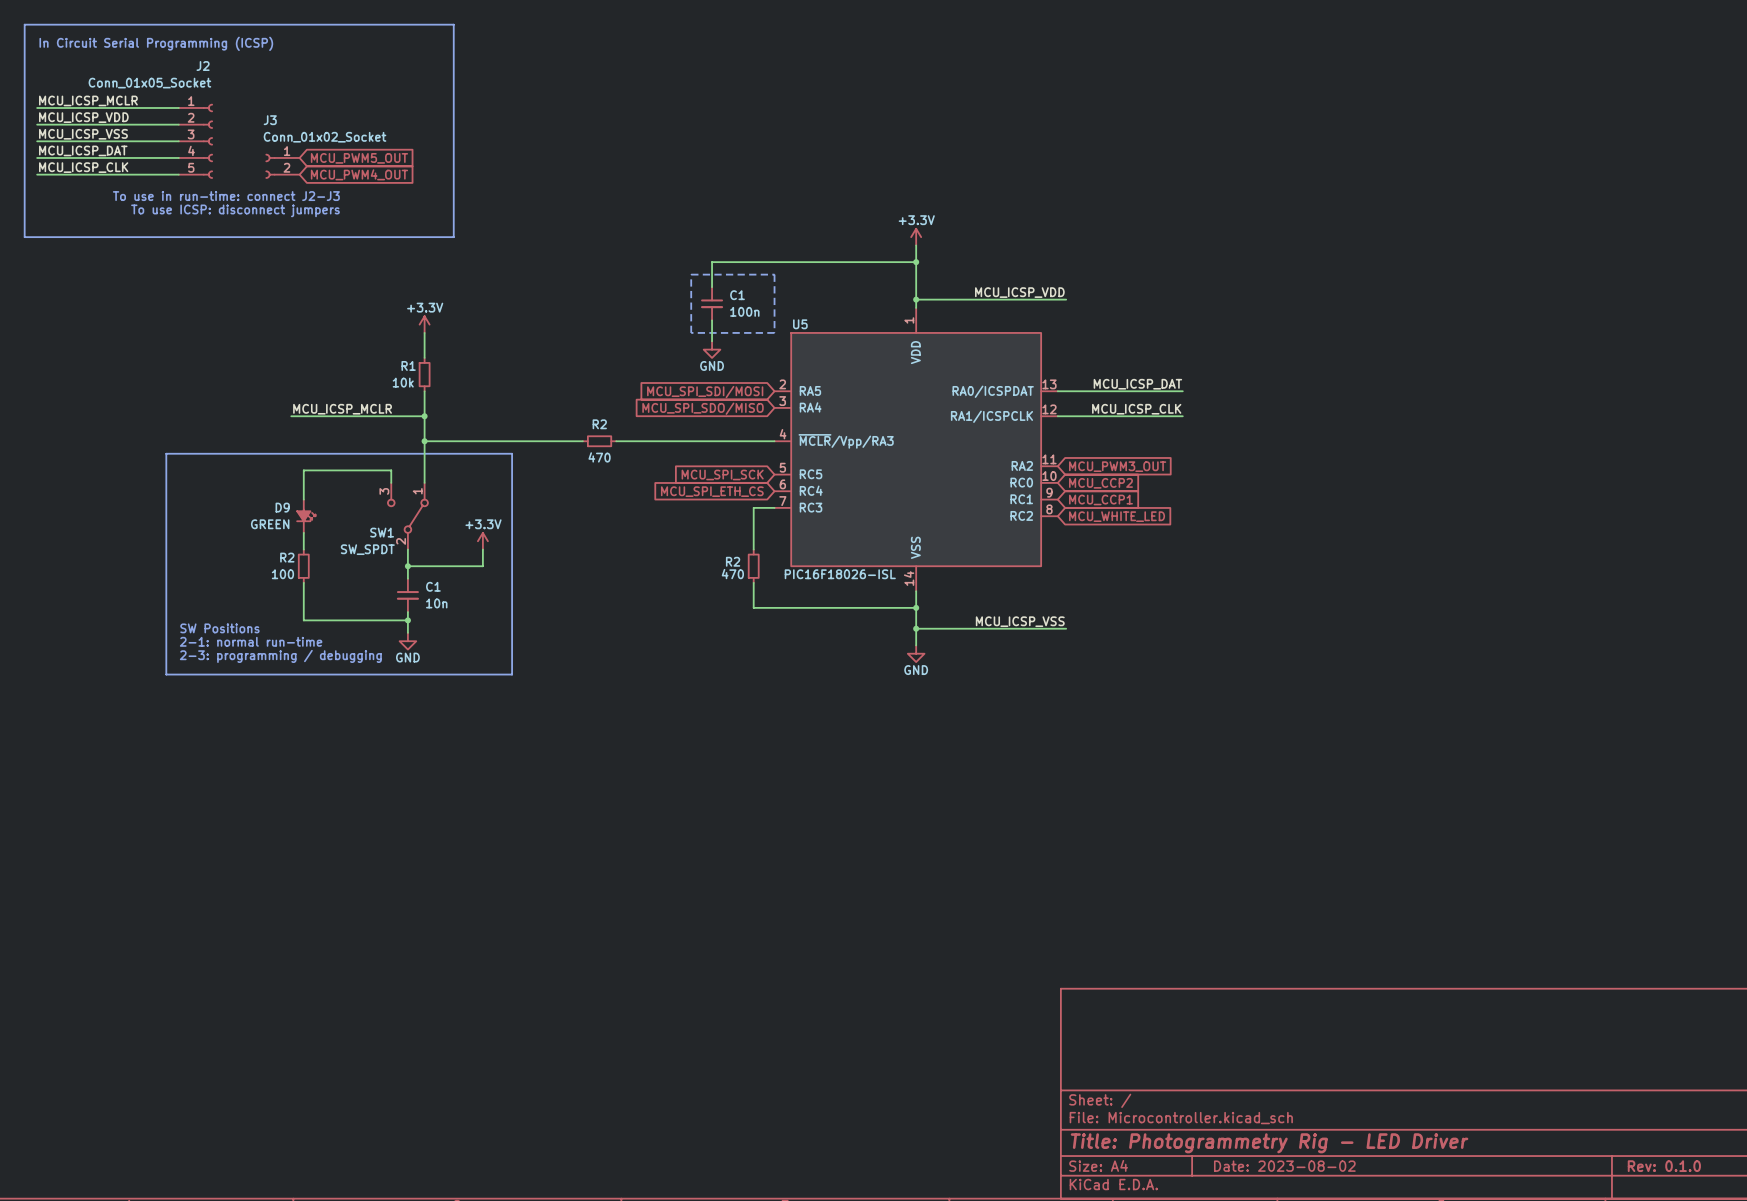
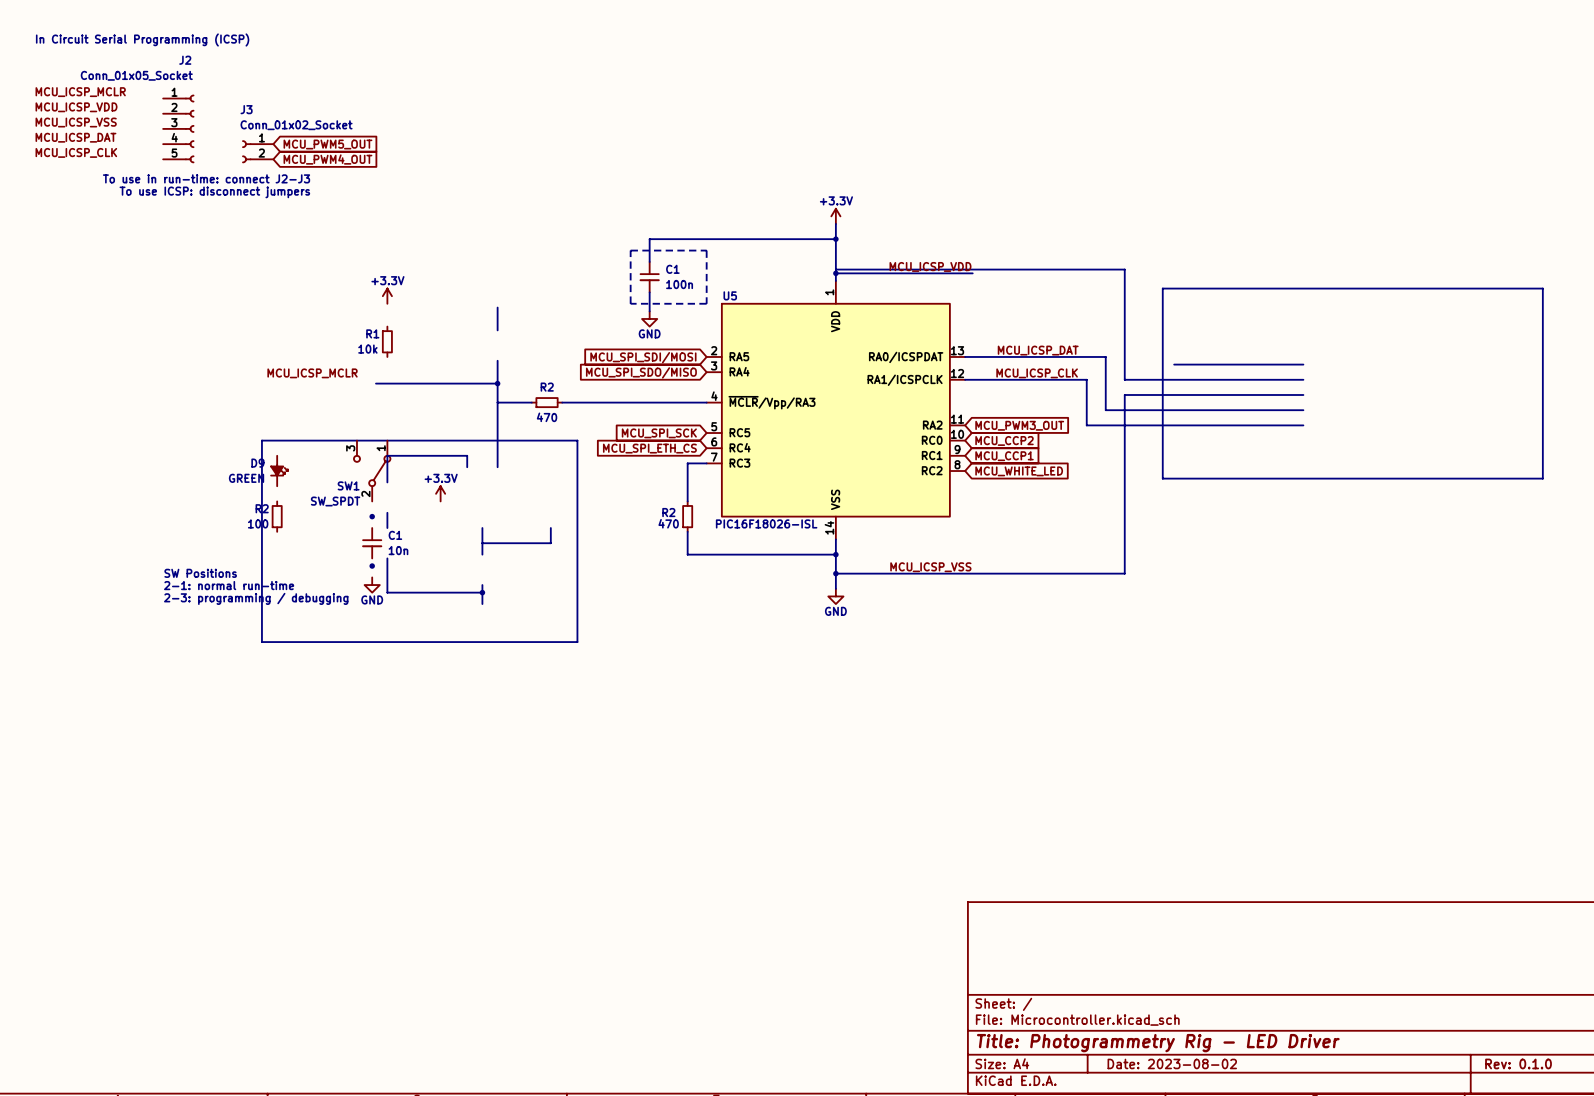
line: (24, 24) (453, 24) (453, 237) (24, 237) (24, 24) -> none
wire: (37, 107) (178, 107) -> none
wire: (37, 124) (178, 124) -> none
wire: (37, 141) (178, 141) -> none
wire: (37, 157) (178, 157) -> none
wire: (37, 174) (178, 174) -> none
wire: none -> (835, 269) (1124, 269) (1124, 379) (1303, 379)
line: none -> (1162, 288) (1542, 288) (1542, 478) (1162, 478) (1162, 288)
wire: (424, 332) (424, 357) -> (497, 307) (497, 330)
wire: (424, 391) (424, 482) -> none
wire: none -> (1079, 356) (1105, 356) (1105, 410) (1303, 410)
wire: none -> (497, 360) (497, 467)
wire: none -> (1174, 364) (1303, 364)
wire: (291, 416) (424, 416) -> (375, 383) (497, 383)
junction: (424, 416) -> none
wire: none -> (1079, 379) (1086, 379) (1086, 425) (1303, 425)
junction: none -> (497, 383)
wire: none -> (1303, 394) (1124, 394) (1124, 573) (972, 573)
wire: (424, 441) (545, 441) -> none
junction: (424, 441) -> none
line: (166, 453) (512, 453) (512, 674) (166, 674) (166, 453) -> (261, 440) (577, 440) (577, 642) (261, 642) (261, 440)
wire: (391, 482) (391, 470) (303, 470) (303, 499) -> (467, 467) (467, 455) (387, 455) (387, 482)
wire: (303, 532) (303, 549) -> (387, 512) (387, 528)
wire: (407, 549) (407, 578) -> (482, 528) (482, 554)
wire: (482, 549) (482, 566) (407, 566) -> (550, 528) (550, 543) (482, 543)
wire: (303, 582) (303, 620) (407, 620) -> (387, 558) (387, 592) (482, 592)
wire: (407, 612) (407, 632) -> (482, 585) (482, 604)
junction: none -> (482, 592)

